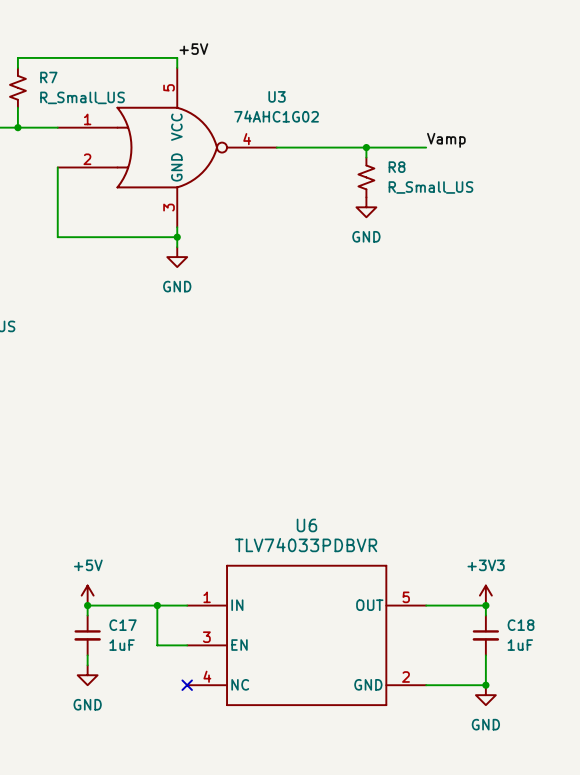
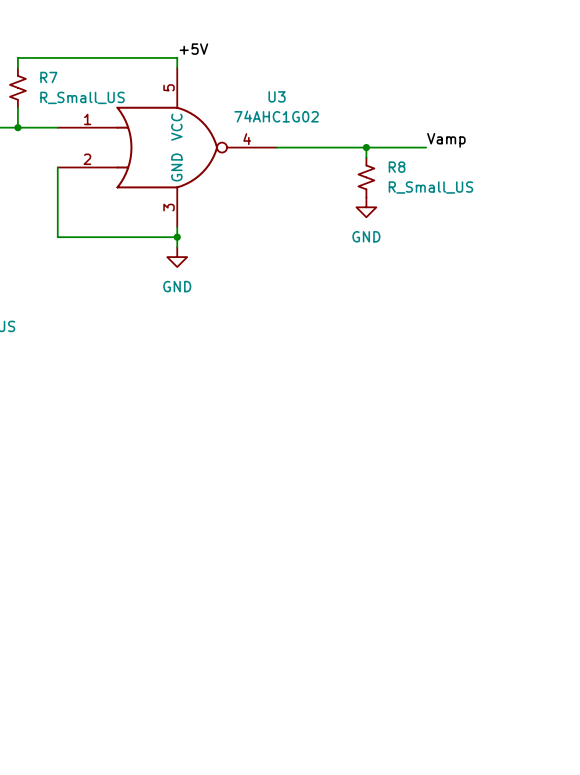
power symbol: +5V (87, 595) -> none
power symbol: +3V3 (485, 595) -> none
junction: (87, 605) -> none
wire: (157, 605) (157, 645) (187, 645) -> none
junction: (157, 605) -> none
wire: (187, 605) (87, 605) (87, 615) -> none
wire: (426, 605) (485, 605) (485, 615) -> none
junction: (485, 605) -> none
C17: 1uF (87, 635) -> none
U6: TLV74033PDBVR (306, 635) -> none
C18: 1uF (485, 635) -> none
wire: (87, 655) (87, 665) -> none
wire: (485, 655) (485, 685) (426, 685) -> none
power symbol: GND (87, 675) -> none
no-connect mark: (187, 685) -> none
junction: (485, 685) -> none
power symbol: GND (485, 695) -> none

